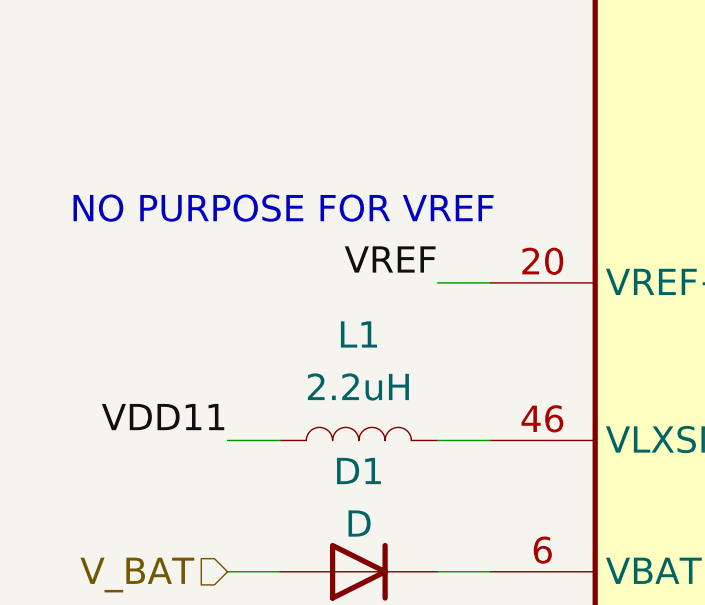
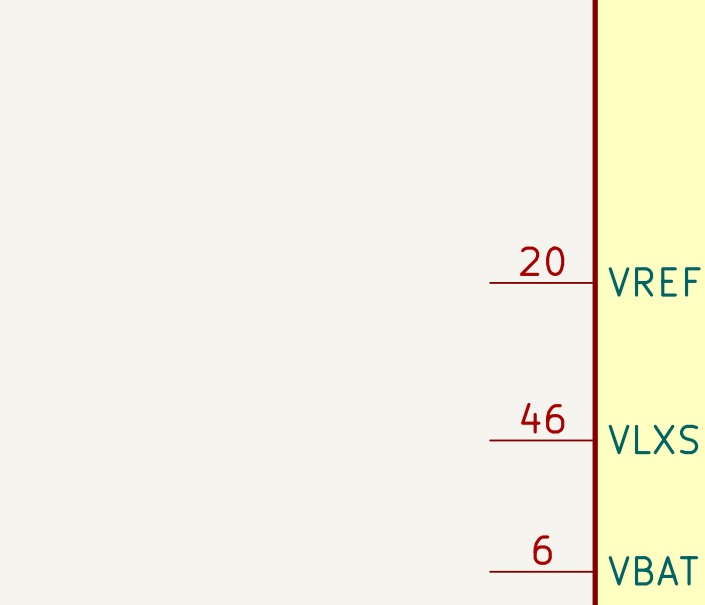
text: NO PURPOSE FOR VREF (283, 208) -> none
label: VREF (390, 259) -> none
wire: (437, 282) (490, 282) -> none
label: VDD11 (163, 417) -> none
L1: 2.2uH (358, 433) -> none
wire: (227, 440) (280, 440) -> none
wire: (437, 440) (490, 440) -> none
wire: (227, 571) (280, 571) -> none
D1: D (358, 571) -> none
wire: (437, 571) (490, 571) -> none
hierarchical label: V_BAT (137, 575) -> none

